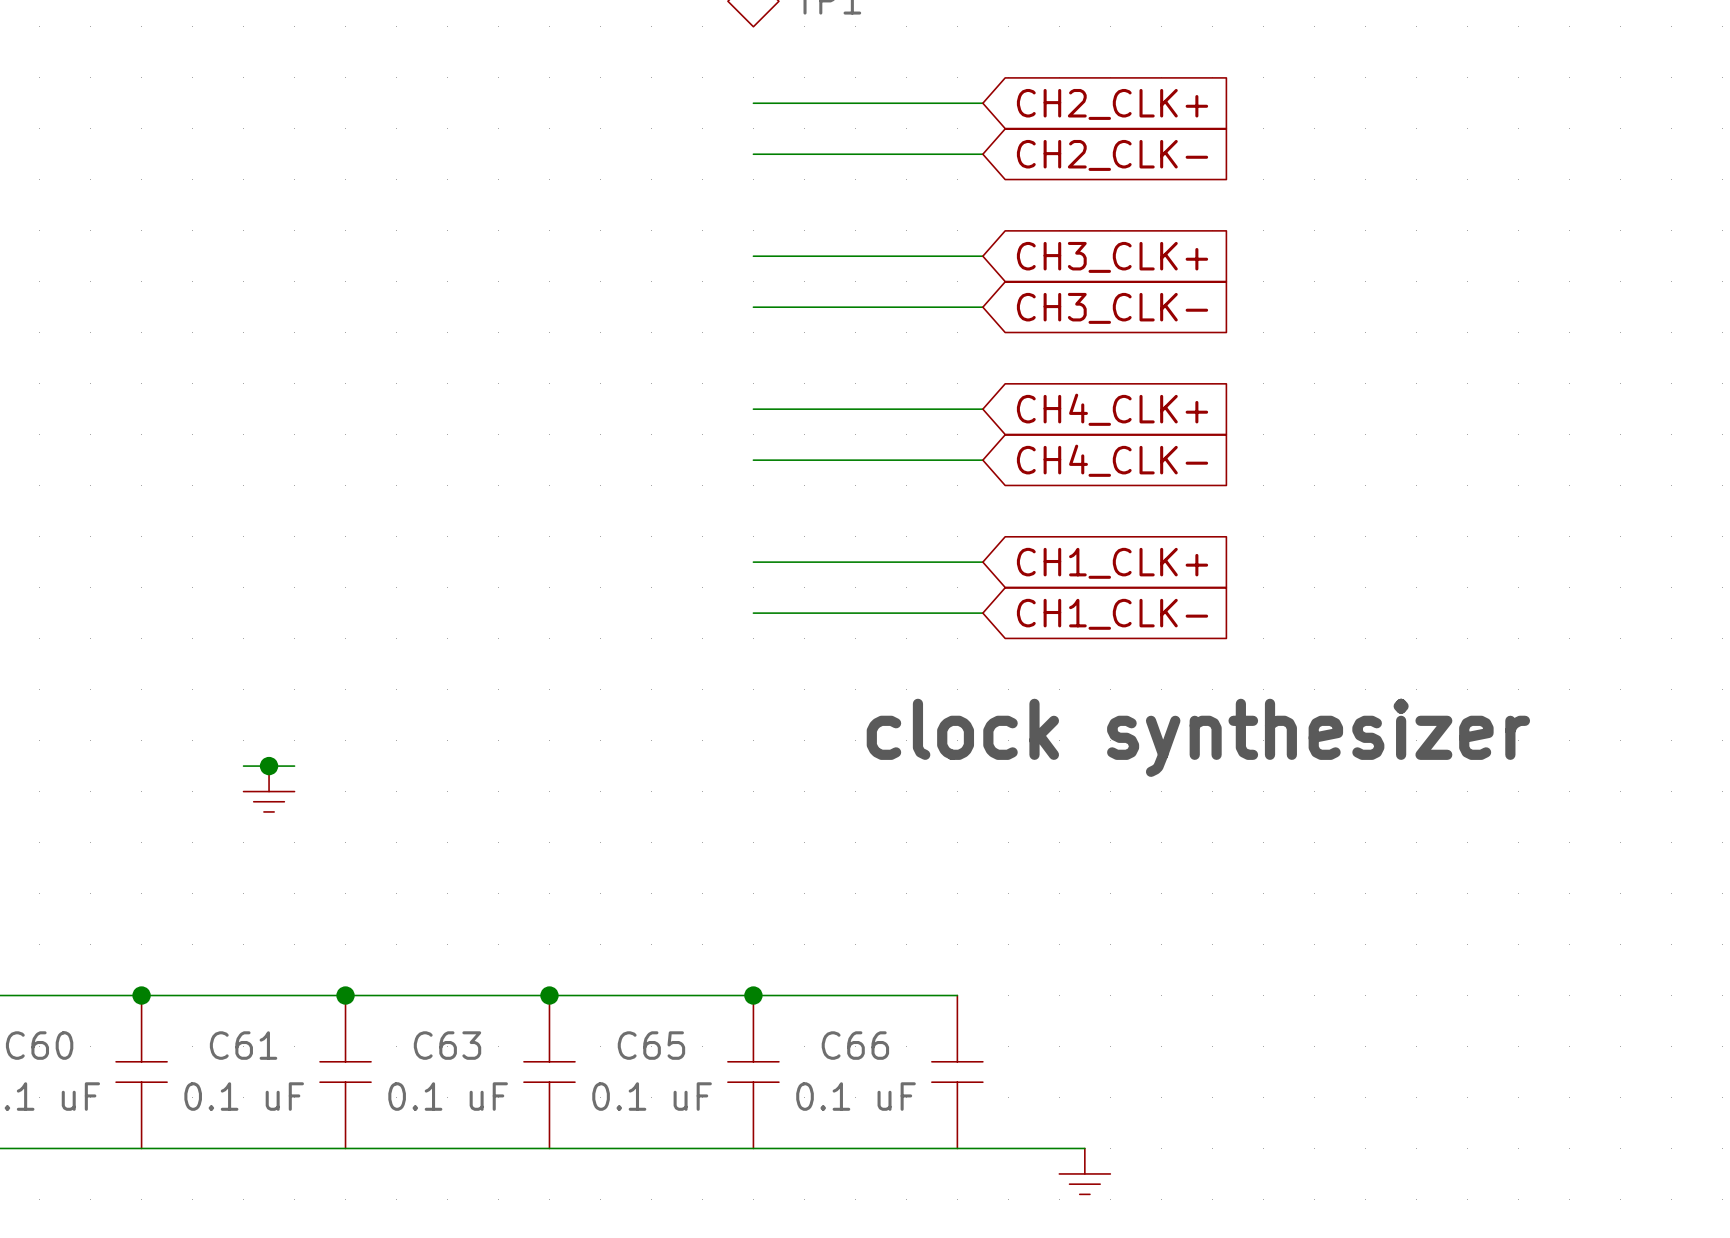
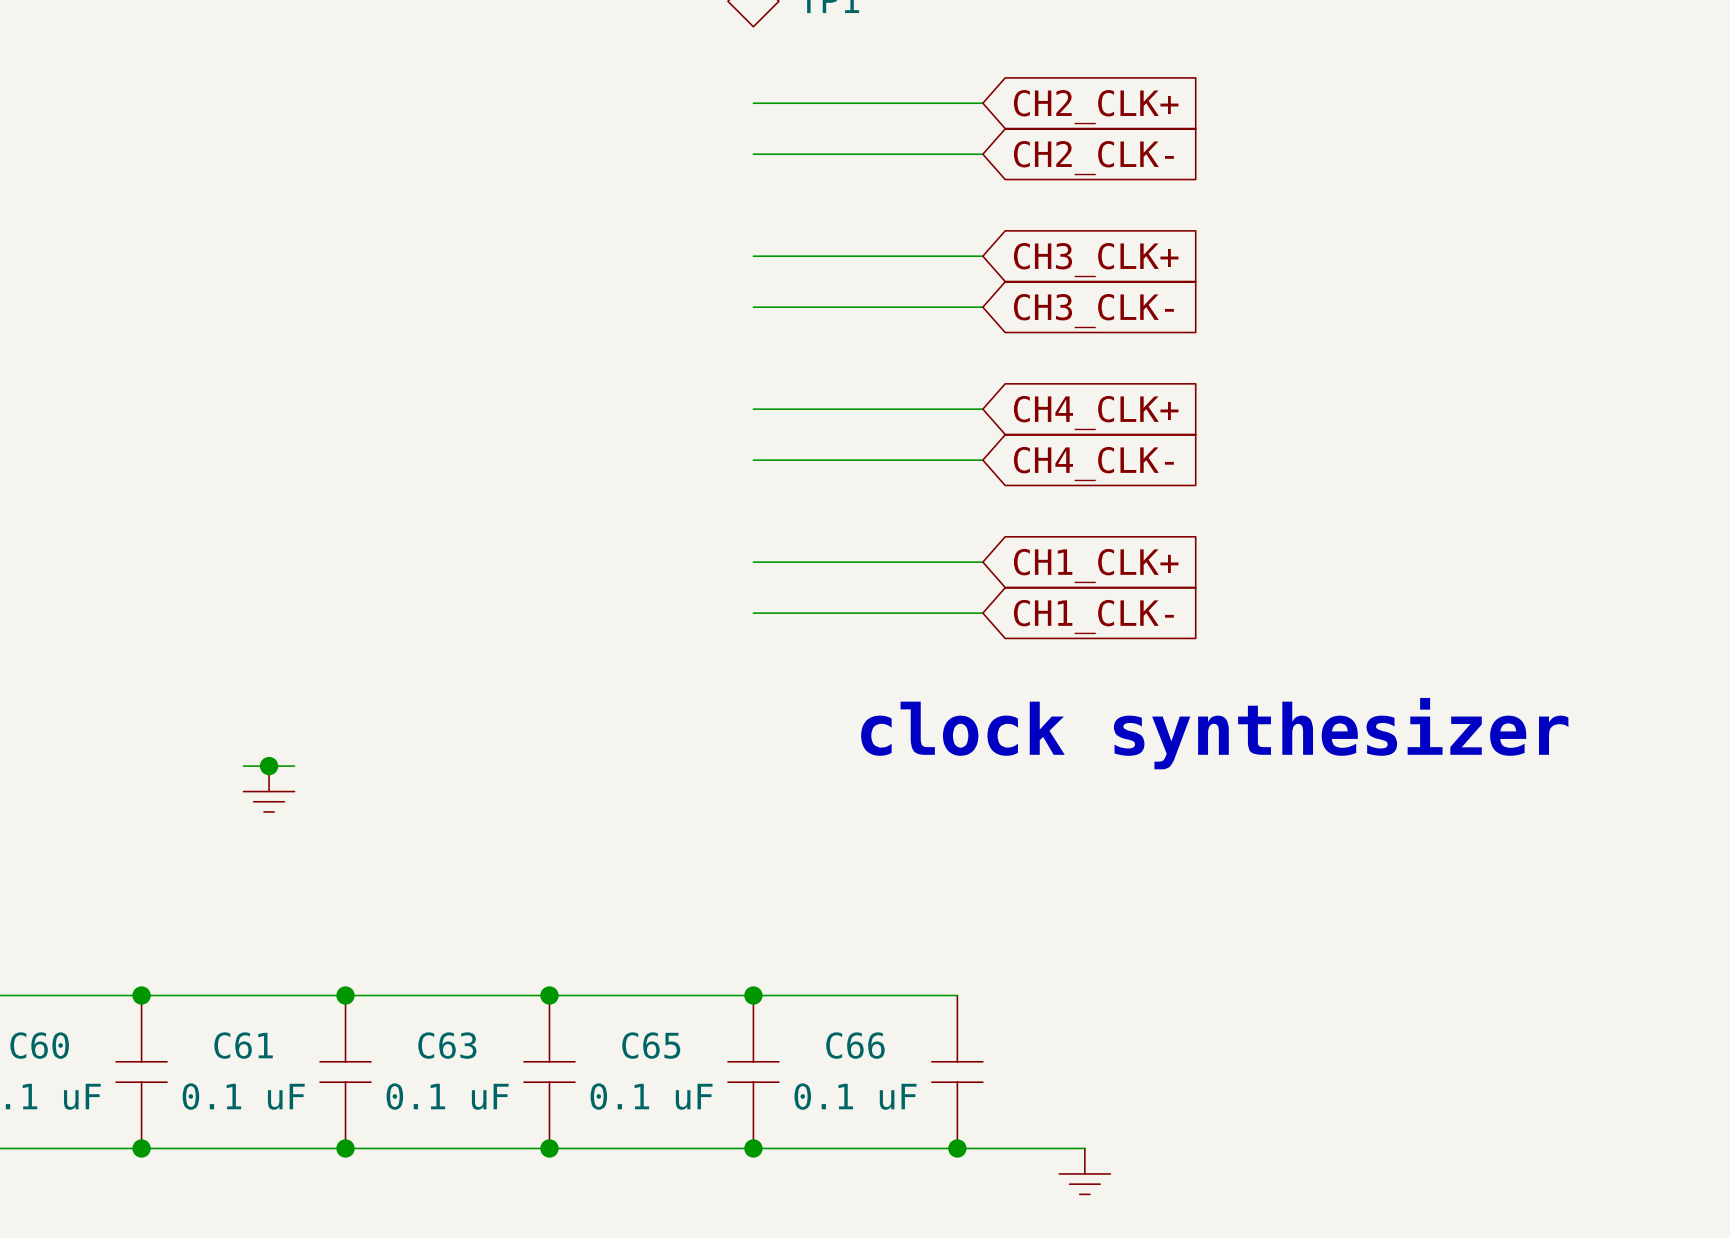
junction: none -> (141, 1148)
junction: none -> (345, 1148)
junction: none -> (549, 1148)
junction: none -> (753, 1148)
junction: none -> (957, 1148)

